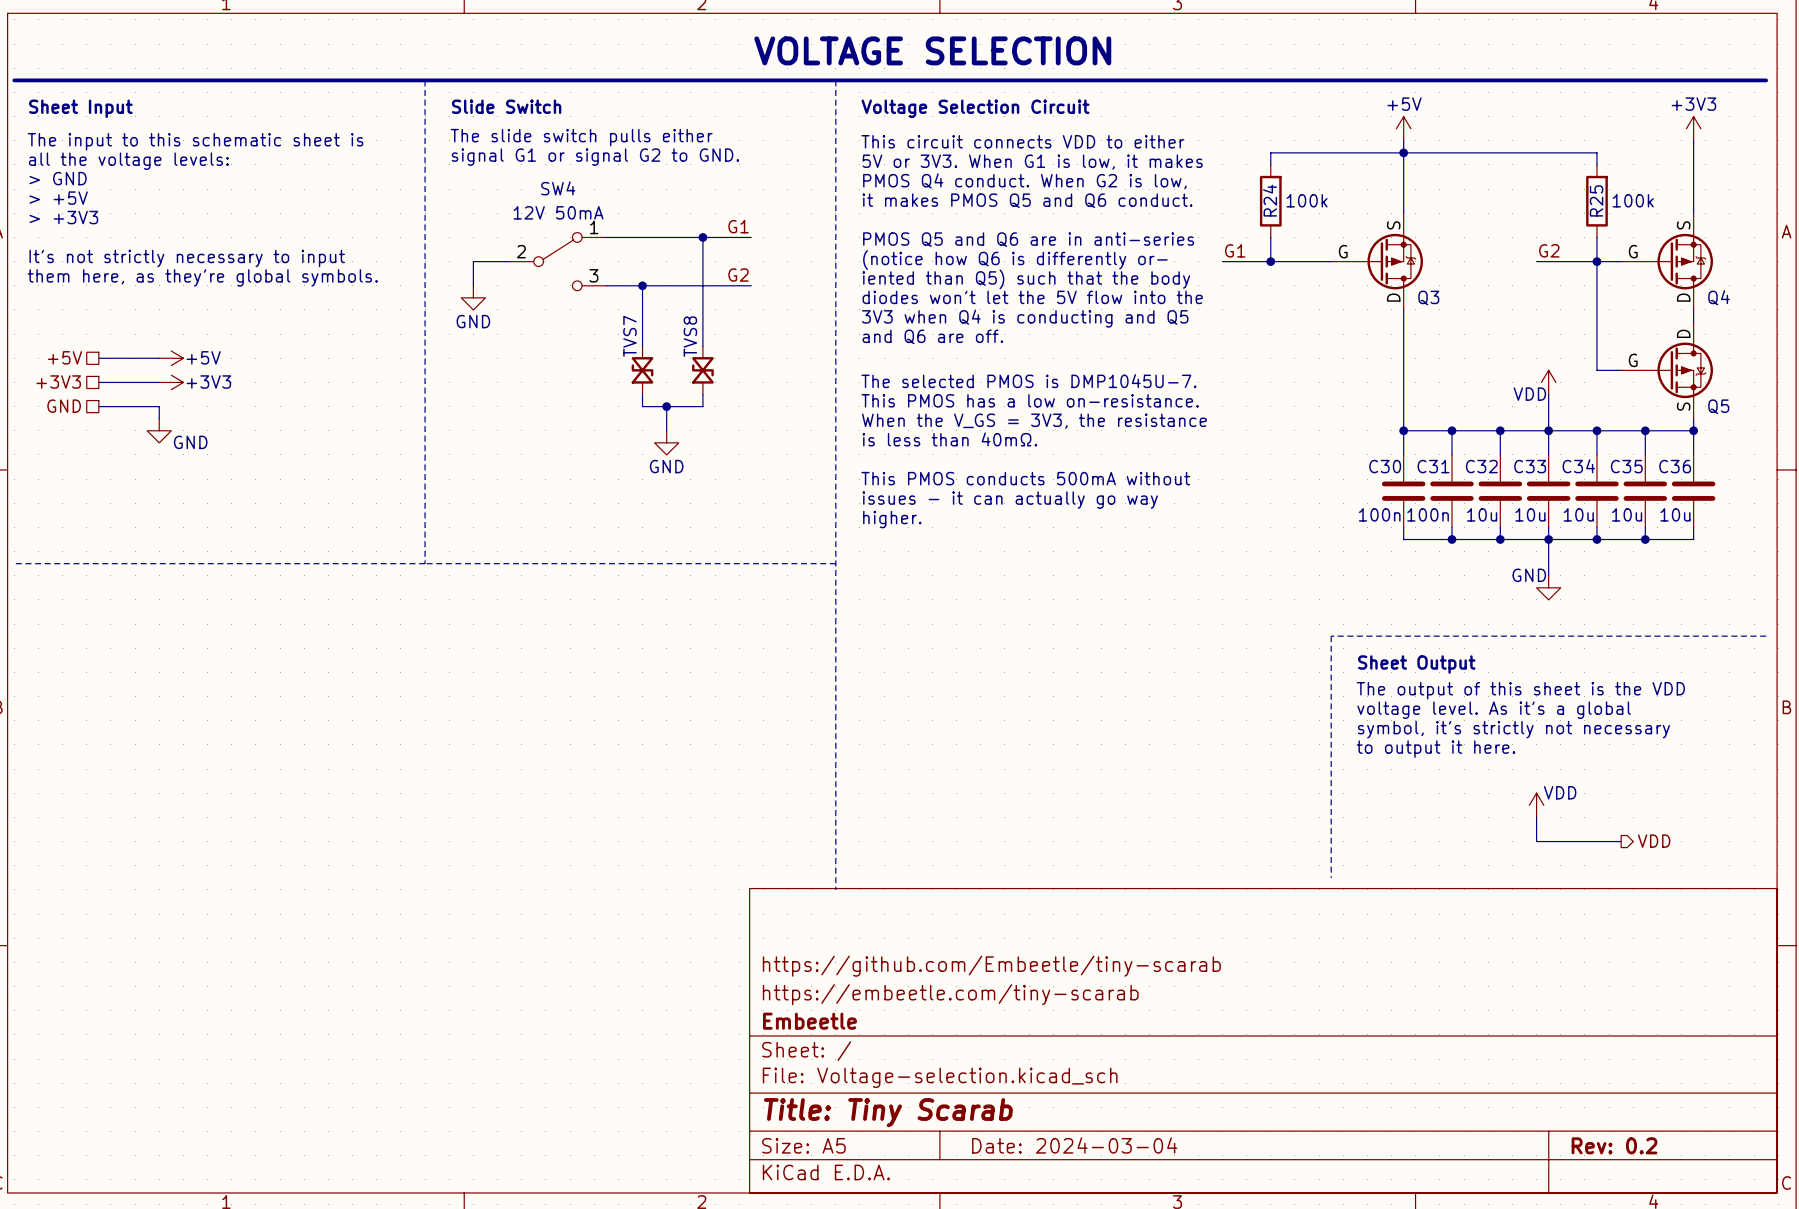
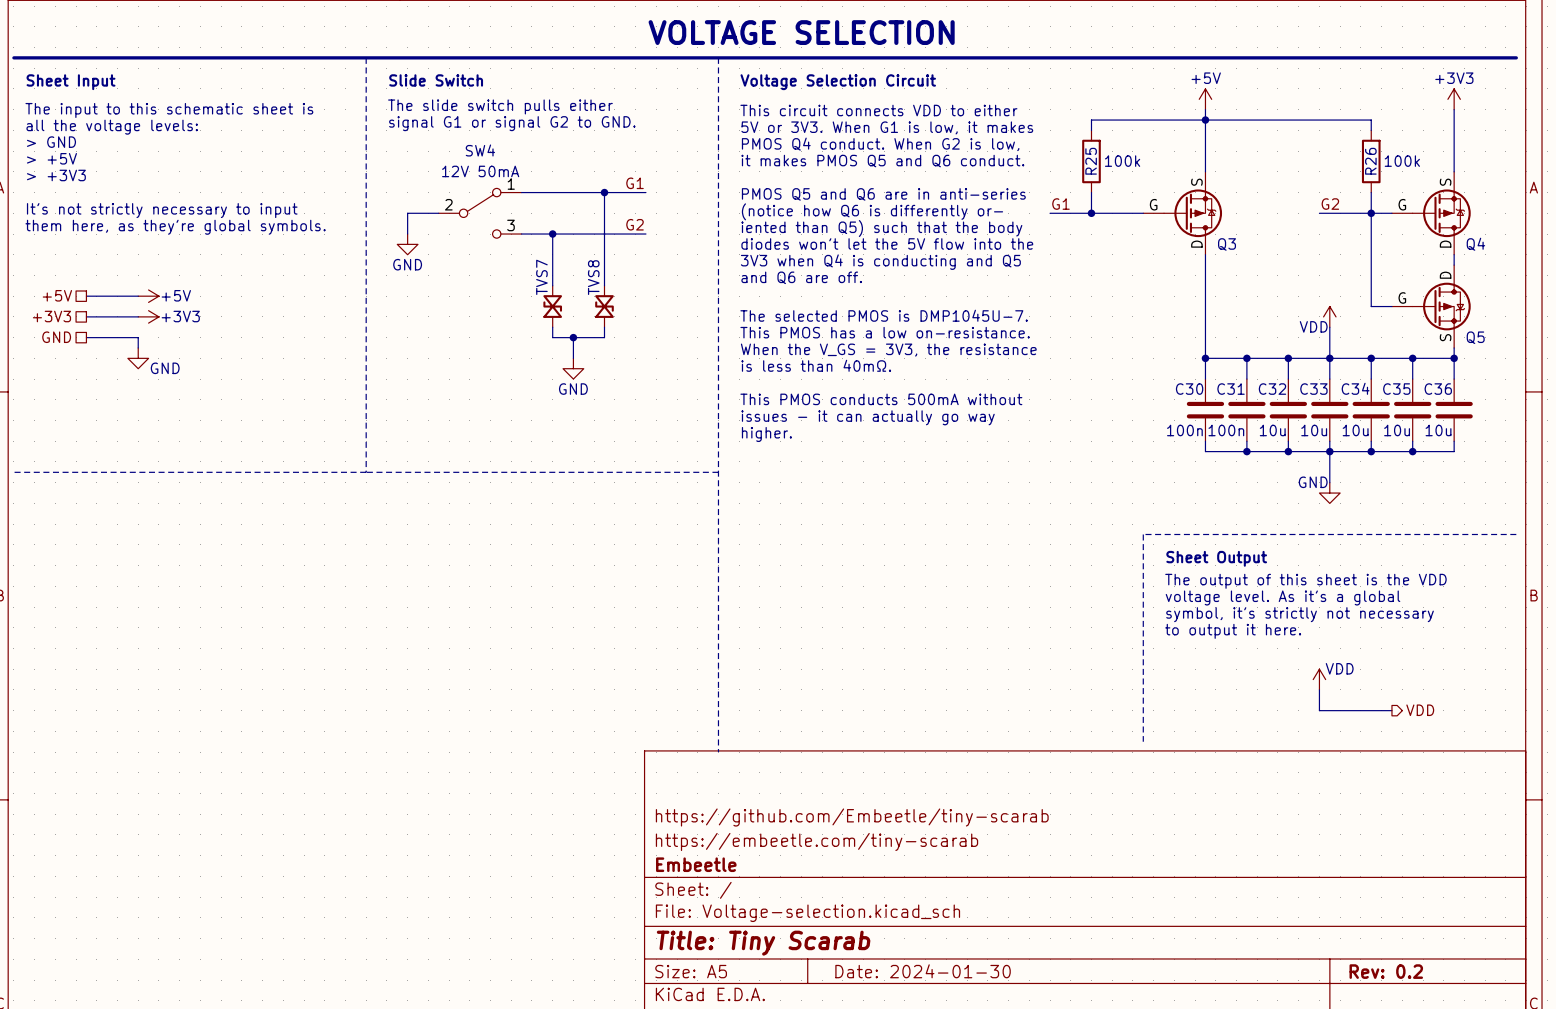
R24 name: R24 (1270, 200) -> R25 (1091, 161)
R25 name: R25 (1596, 200) -> R26 (1370, 161)
title block: Date: 2024-03-04 (1074, 1145) -> Date: 2024-01-30 (923, 971)

